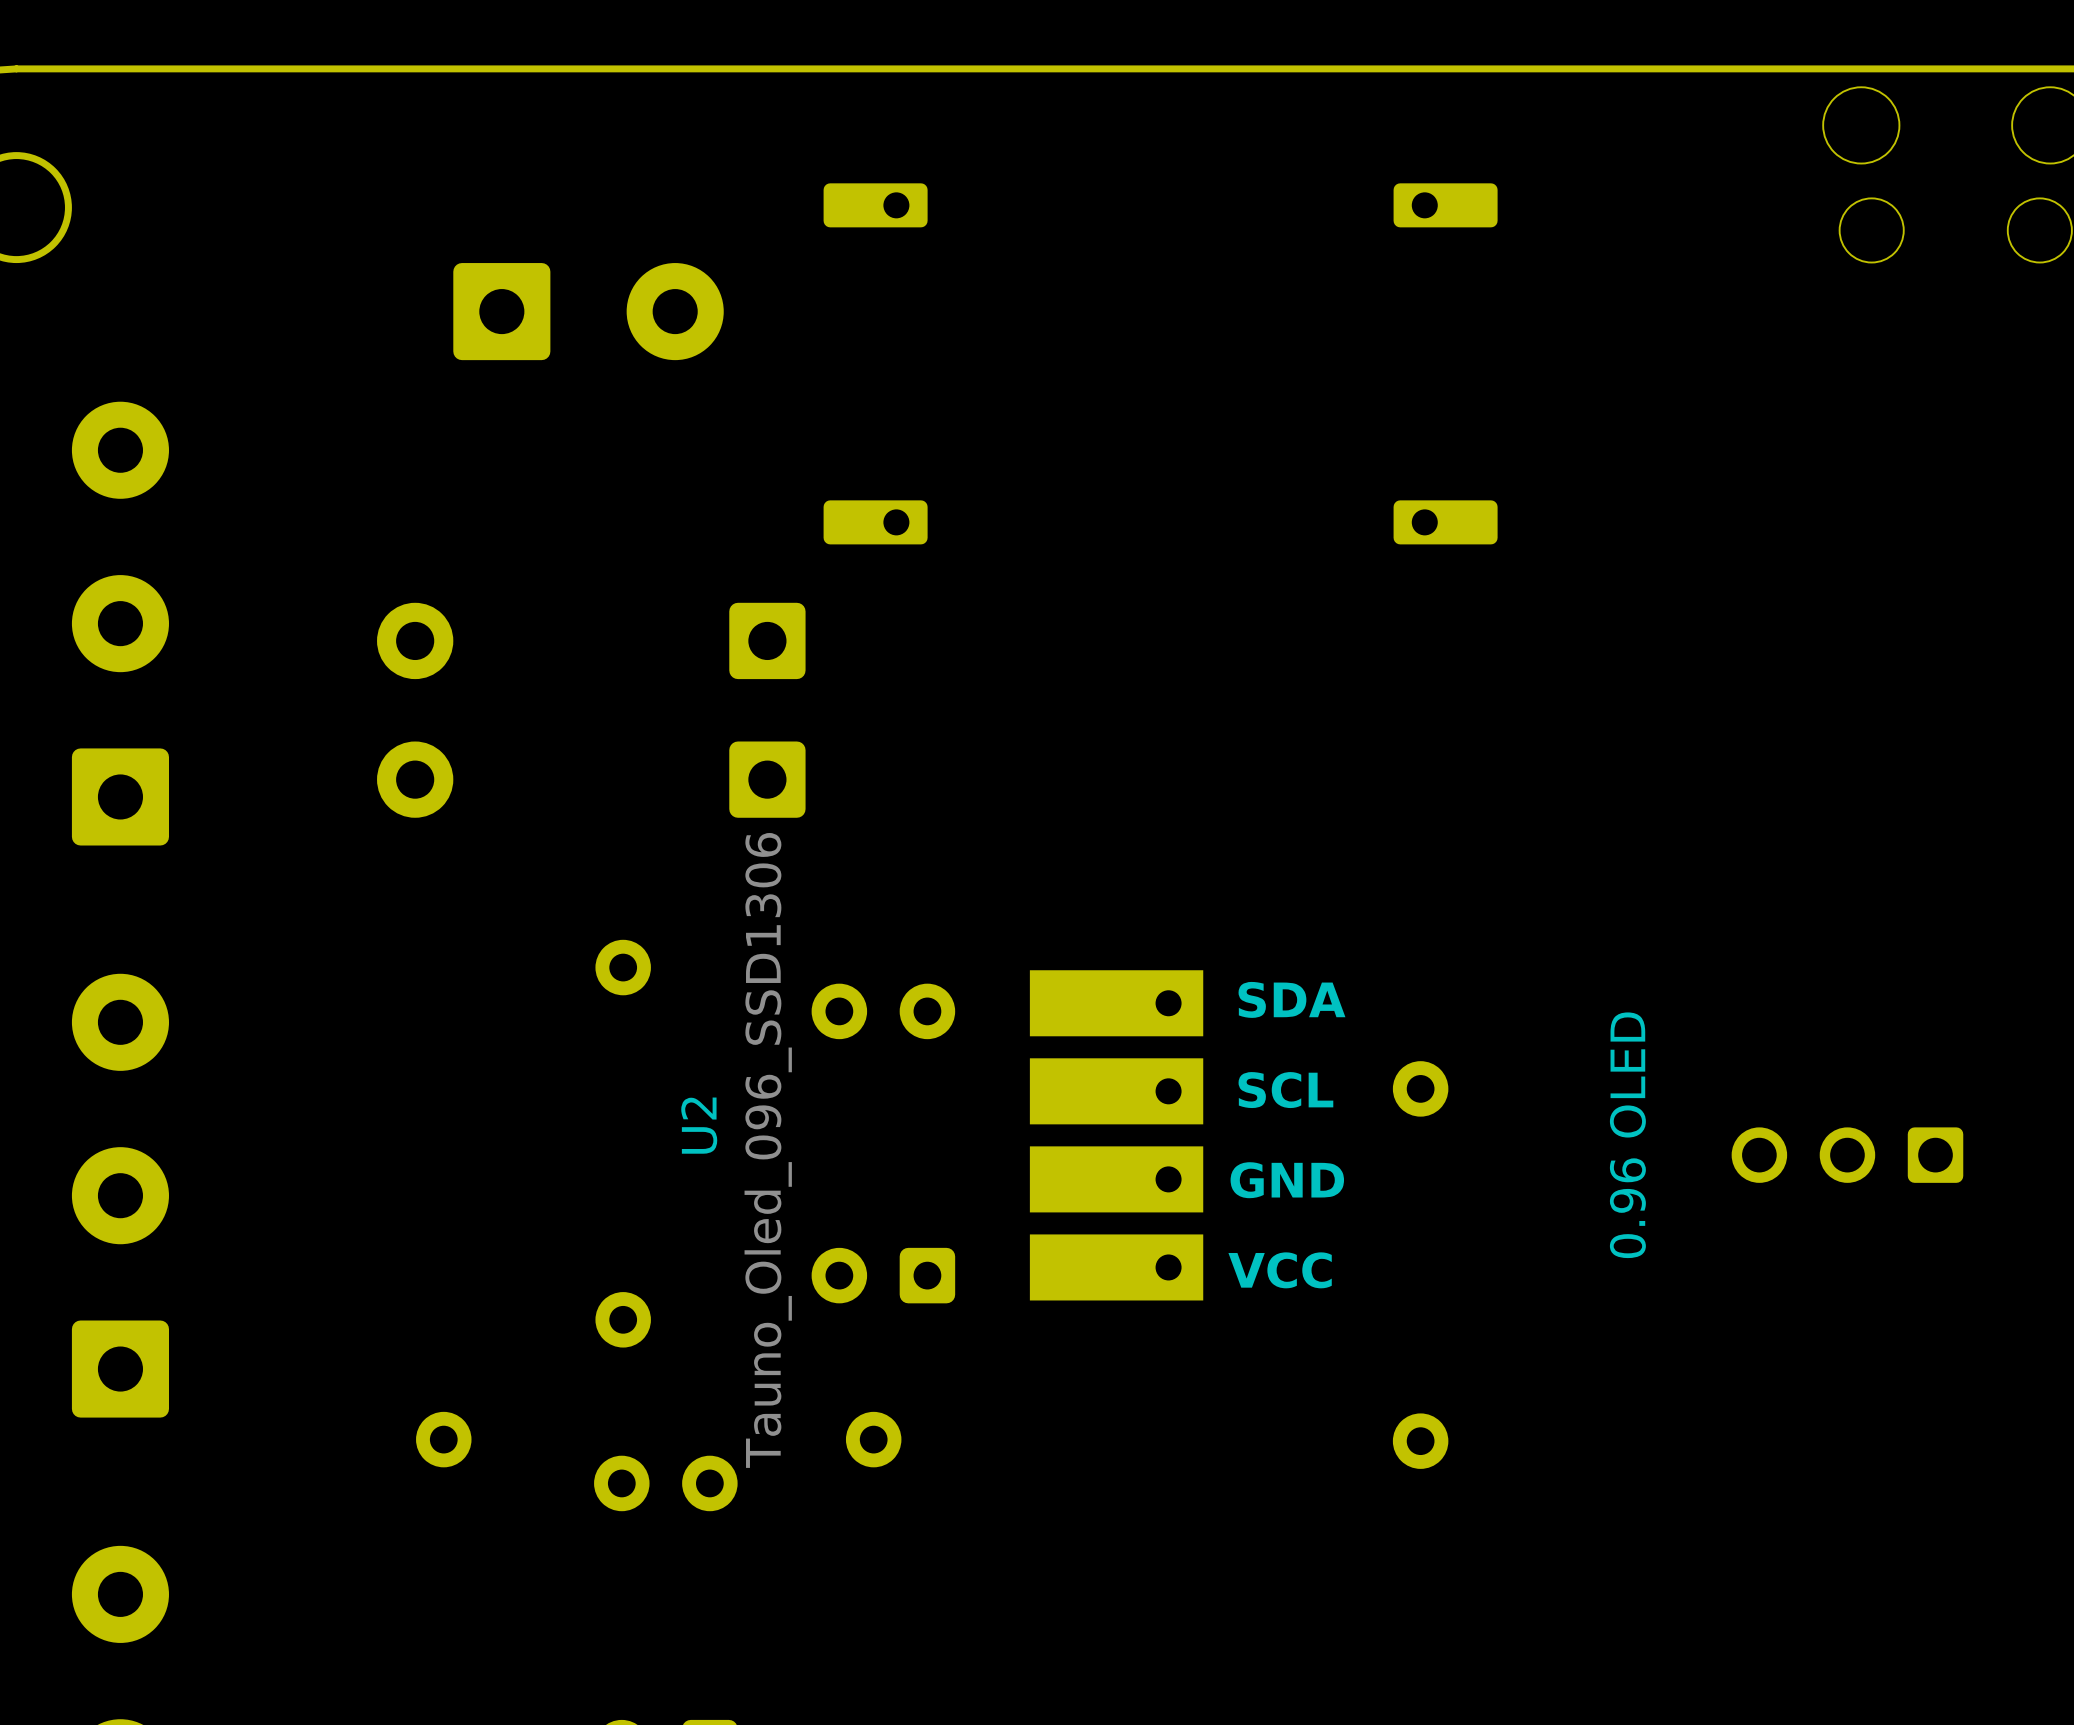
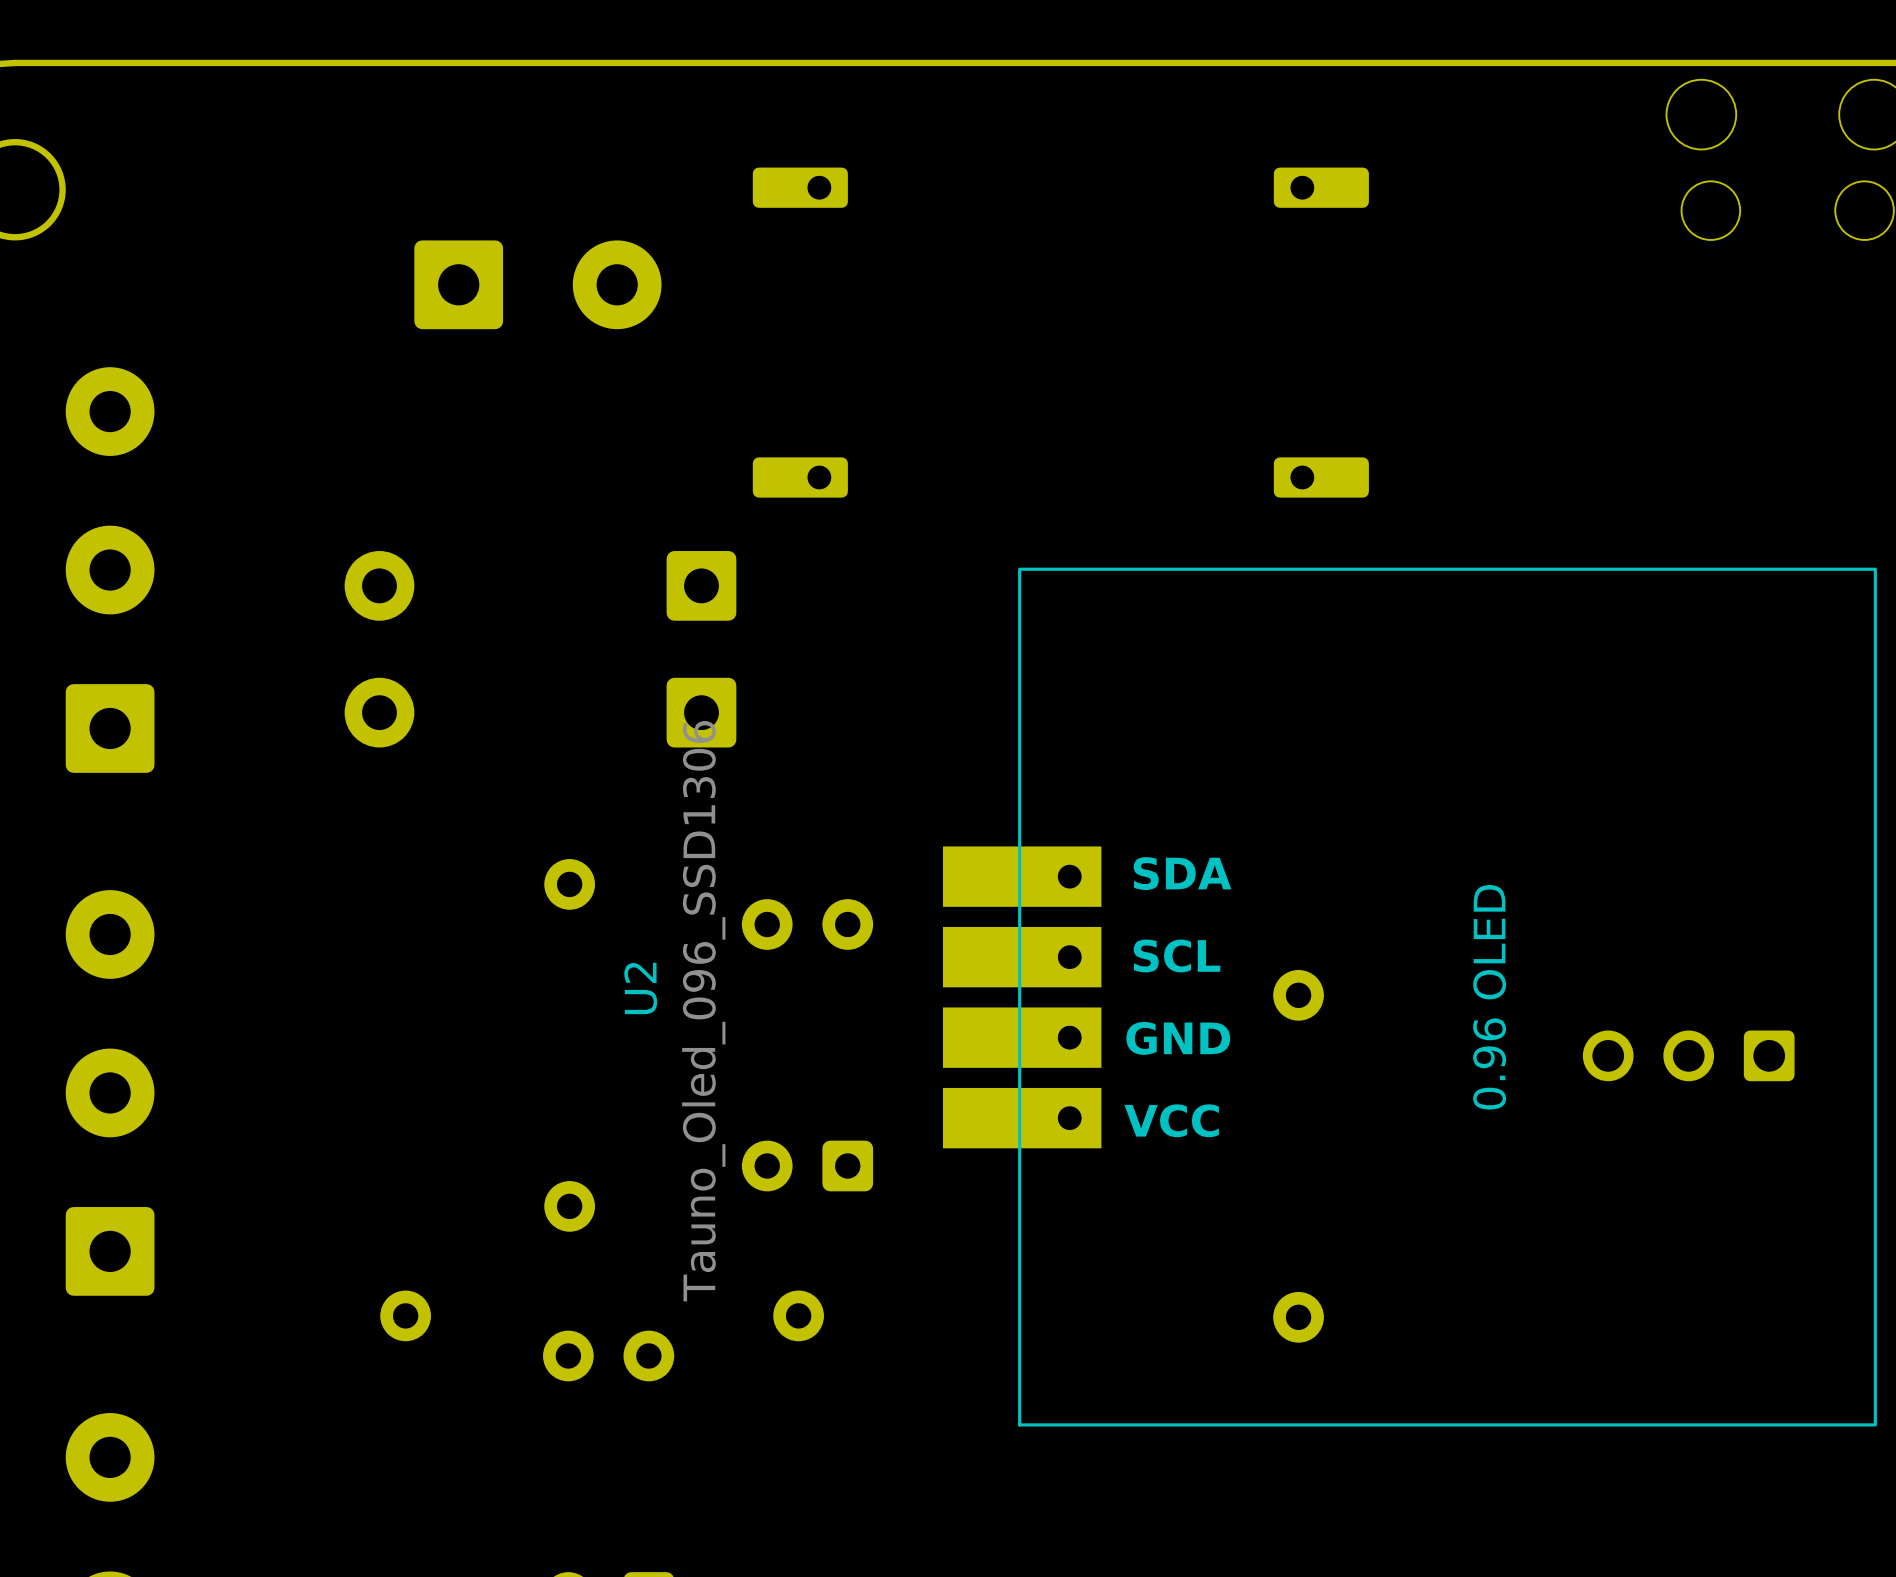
U2 footprint: [1029, 970, 1204, 1301] -> [942, 567, 1877, 1427]
U2 name position: U2 (699, 1125) -> U2 (640, 988)
U2 value position: Tauno_Oled_096_SSD1306 (768, 1150) -> Tauno_Oled_096_SSD1306 (703, 1011)

